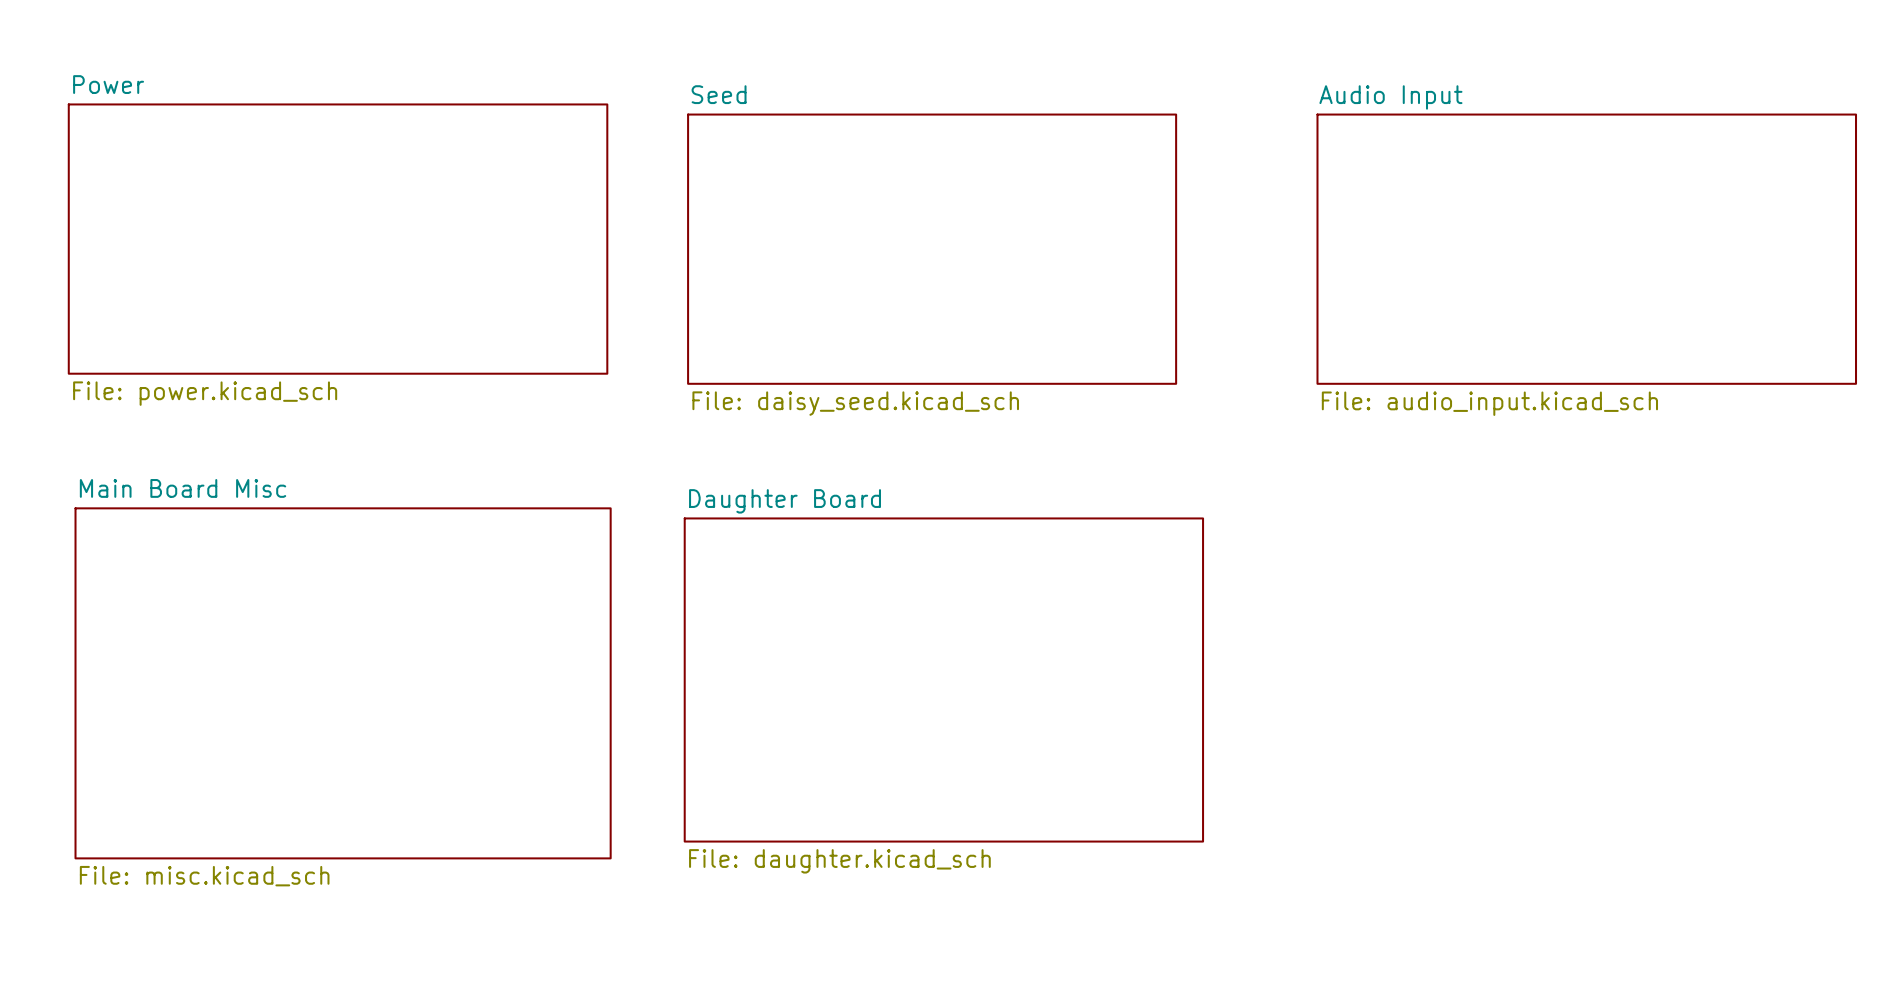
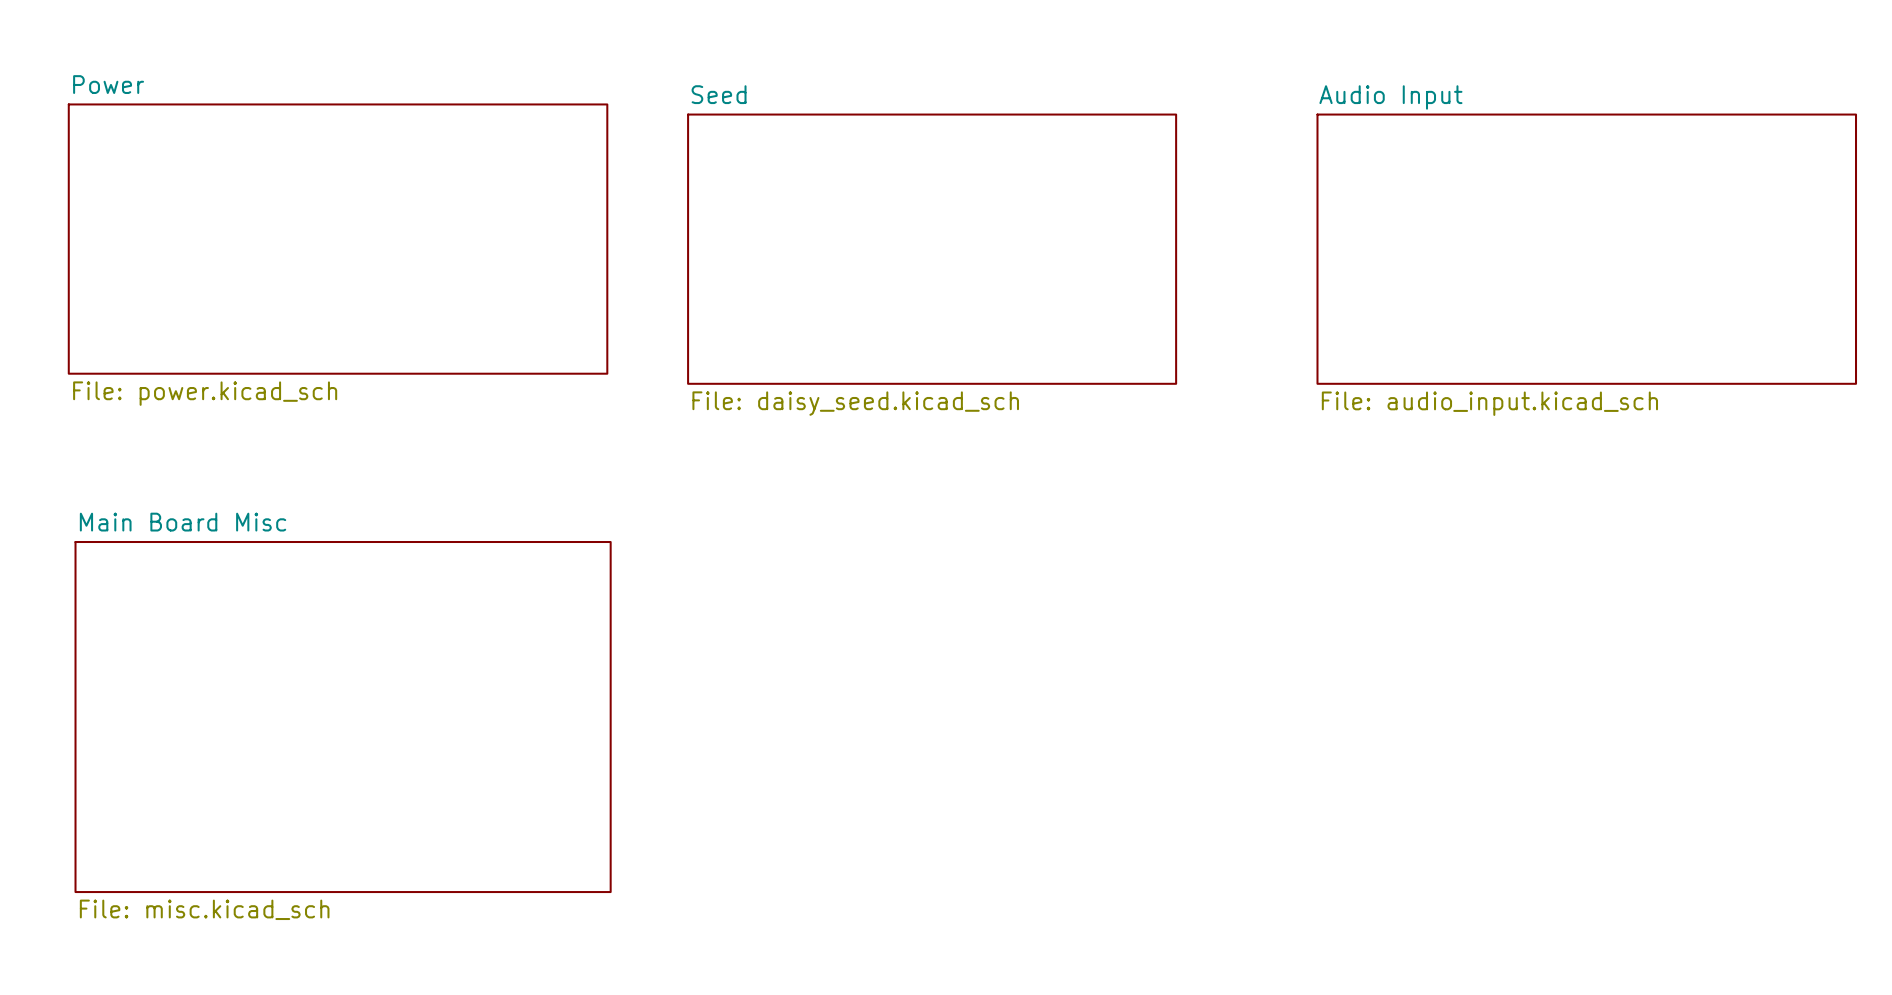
sheet Daughter Board: File: daughter.kicad_sch (943, 680) -> none
sheet Main Board Misc position: (343, 683) -> (343, 717)

